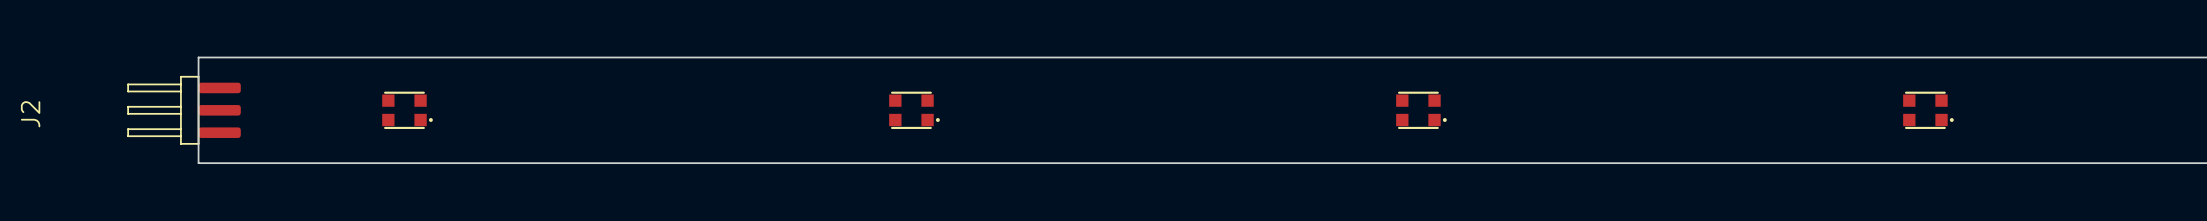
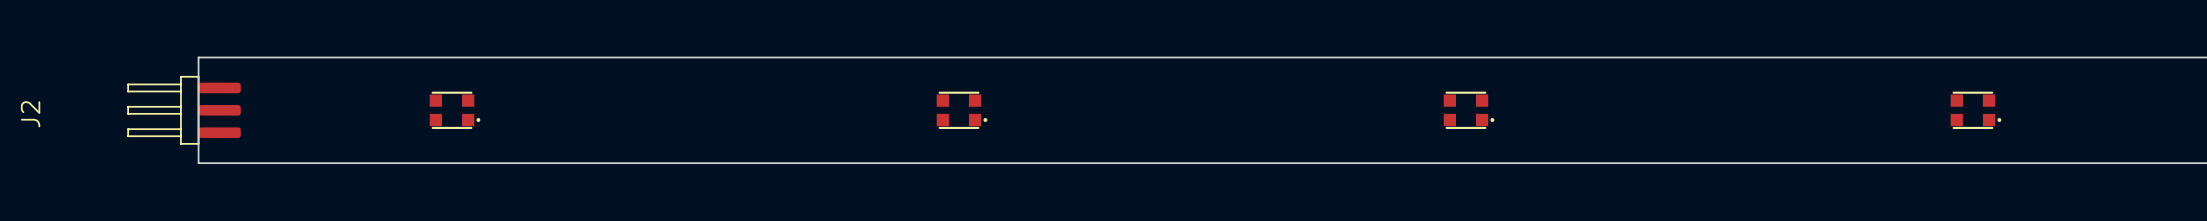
part position: (407, 110) -> (455, 110)
part position: (914, 110) -> (962, 110)
part position: (1421, 110) -> (1469, 110)
part position: (1928, 110) -> (1975, 110)

